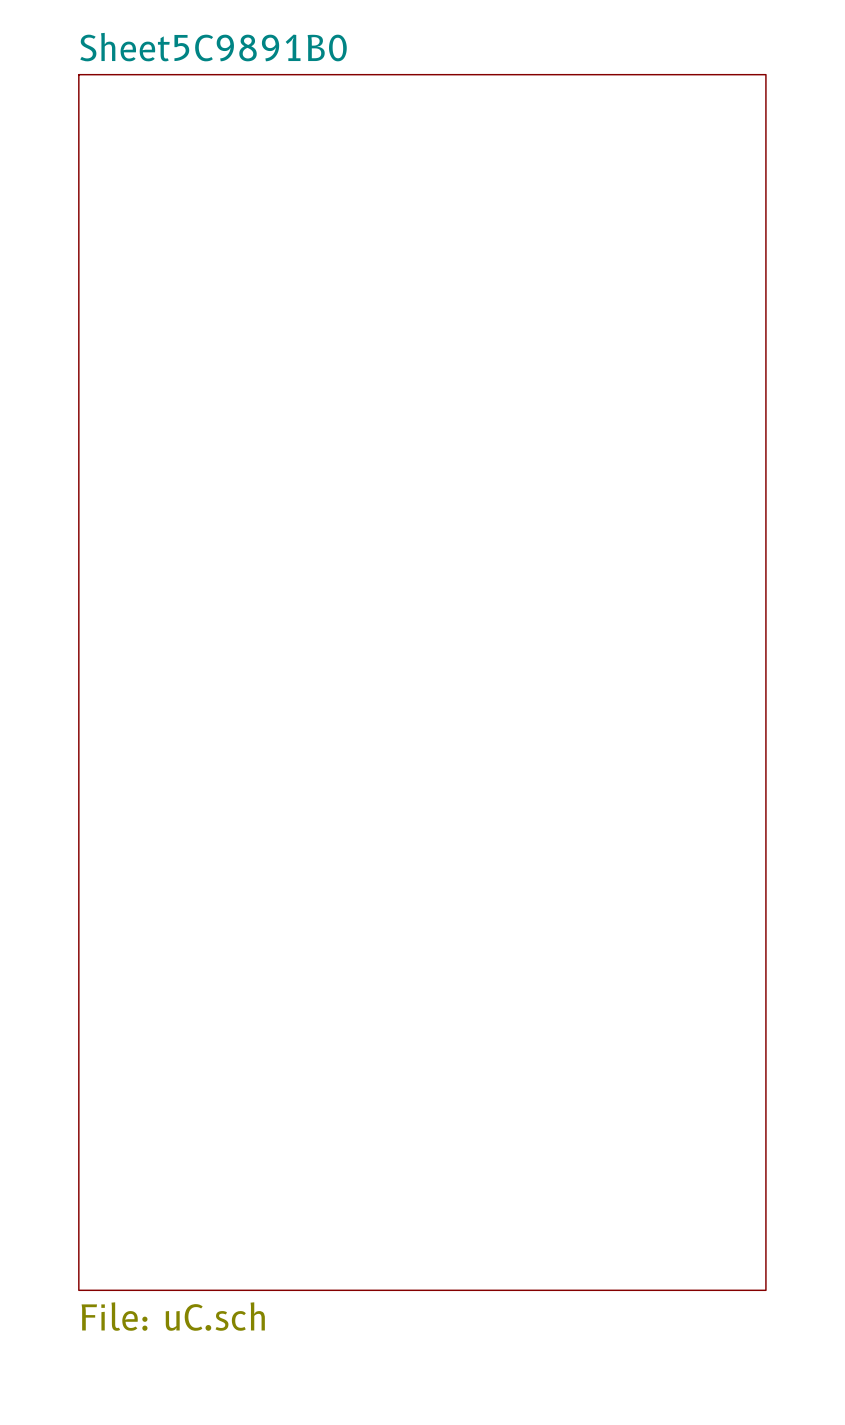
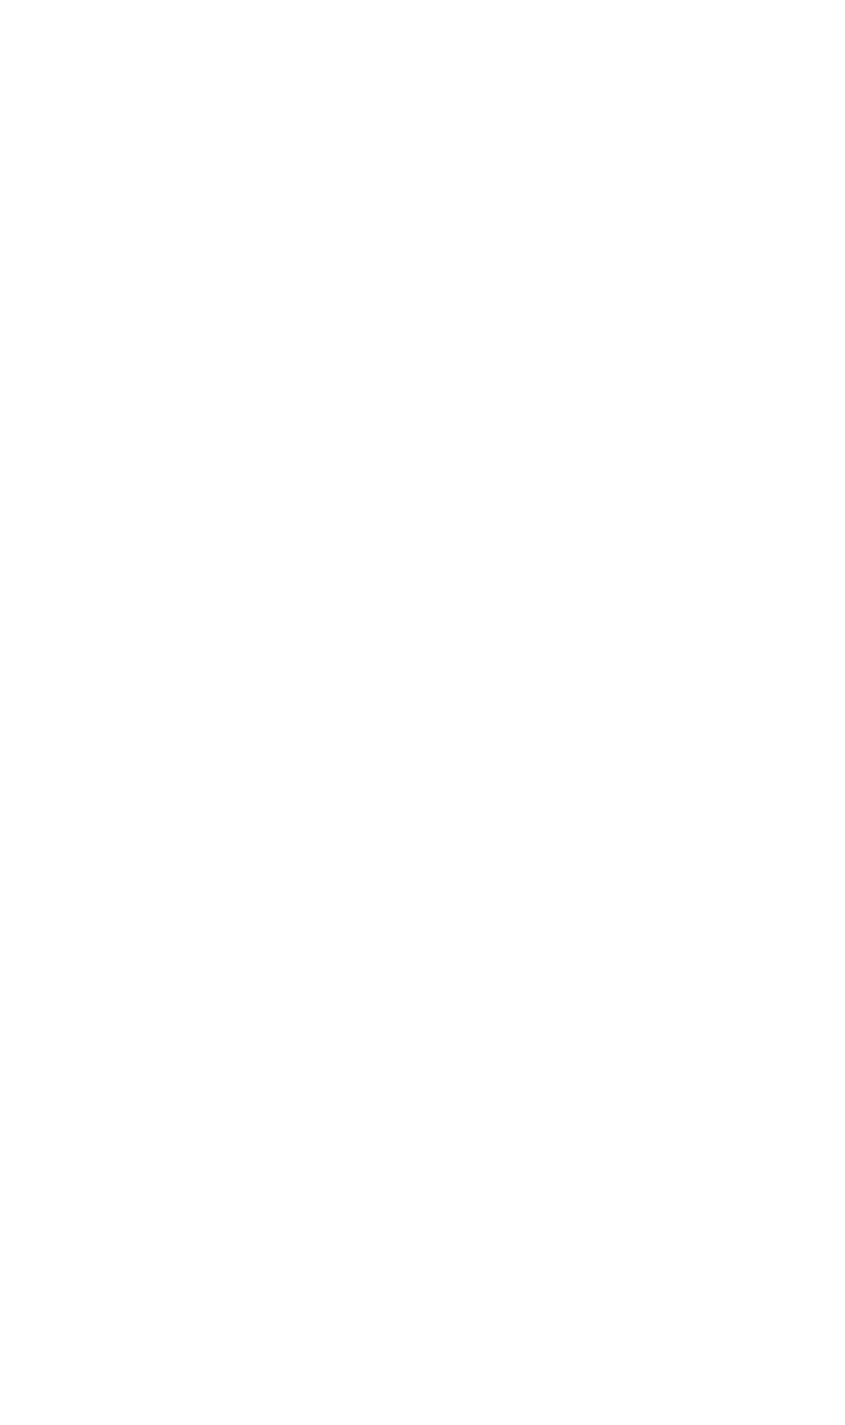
sheet Sheet5C9891B0: File: uC.sch (422, 682) -> none

